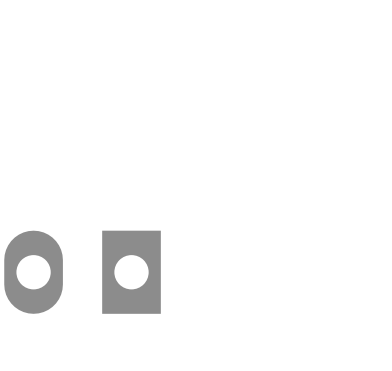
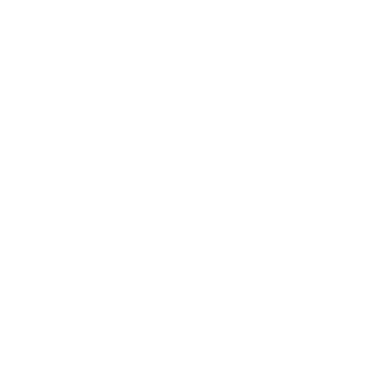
part: (82, 272) -> none

